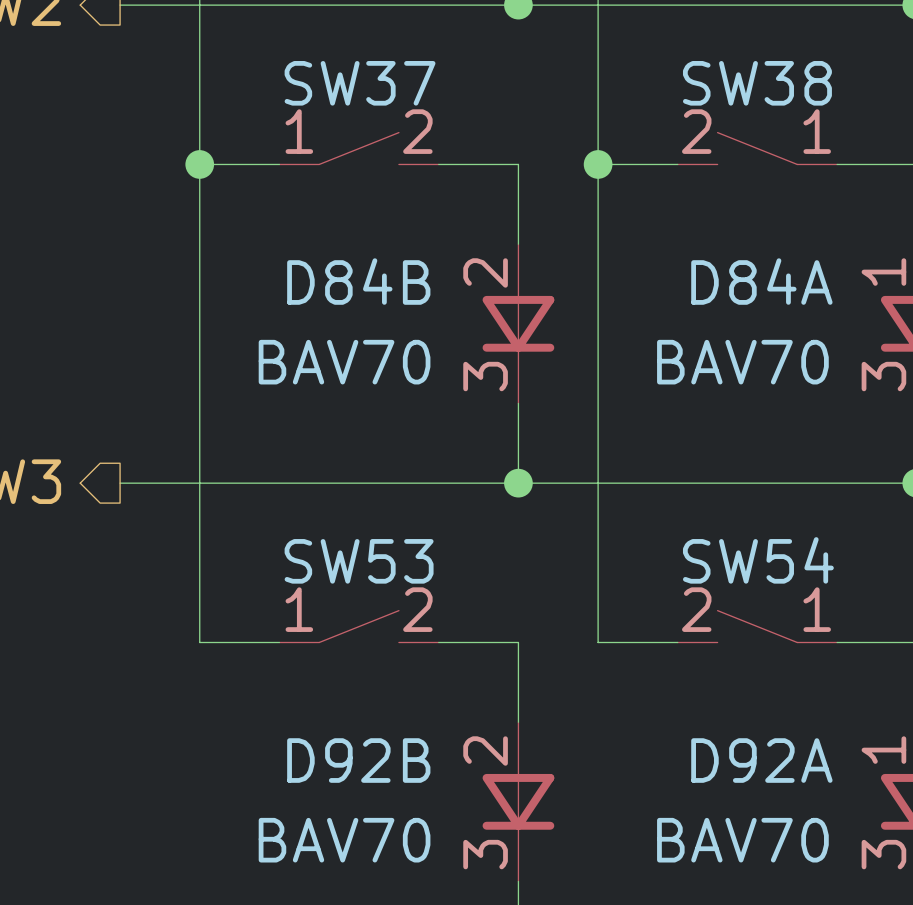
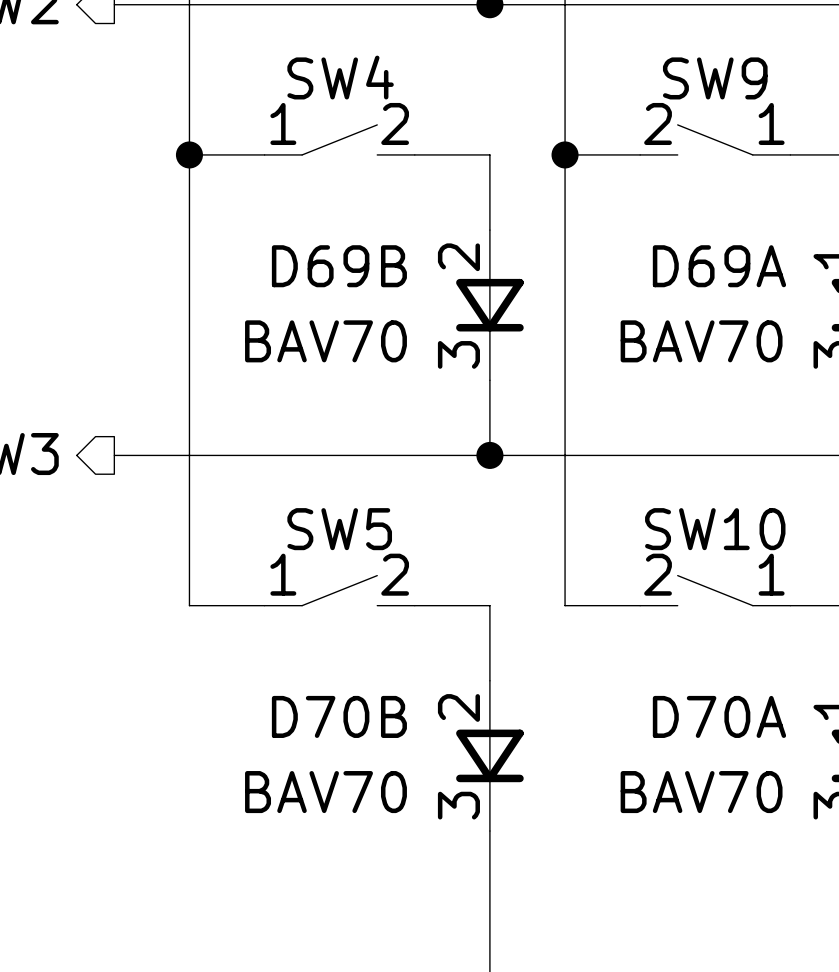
SW37 name: SW37 (360, 83) -> SW4 (340, 77)
SW38 name: SW38 (757, 83) -> SW9 (715, 78)
D84B name: D84B (358, 281) -> D69B (339, 266)
D84A name: D84A (761, 281) -> D69A (719, 266)
SW54 name: SW54 (758, 560) -> SW10 (715, 529)
SW53 name: SW53 (359, 561) -> SW5 (339, 529)
D92B name: D92B (358, 760) -> D70B (339, 716)
D92A name: D92A (761, 760) -> D70A (719, 716)

